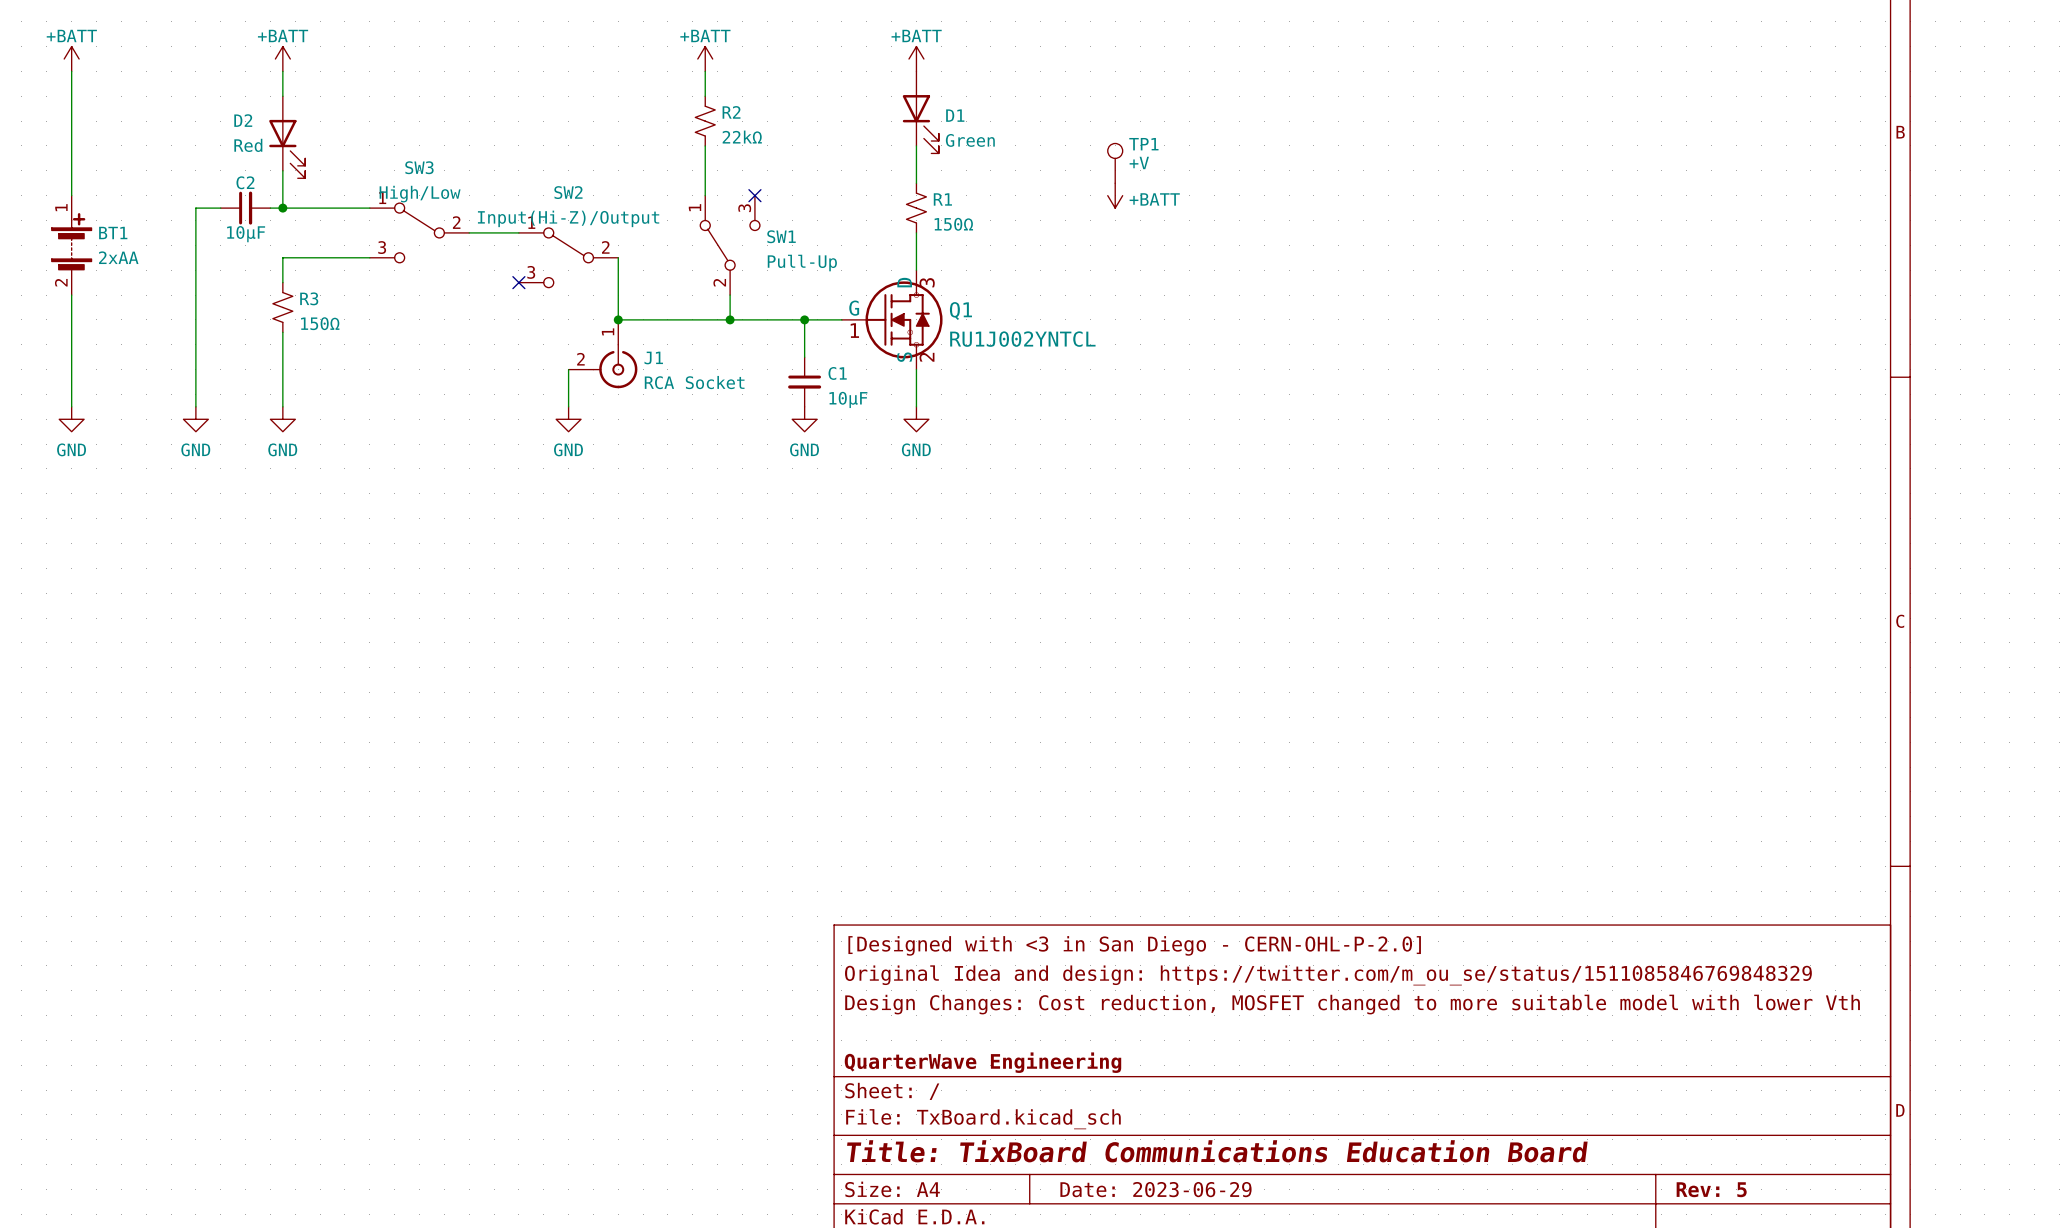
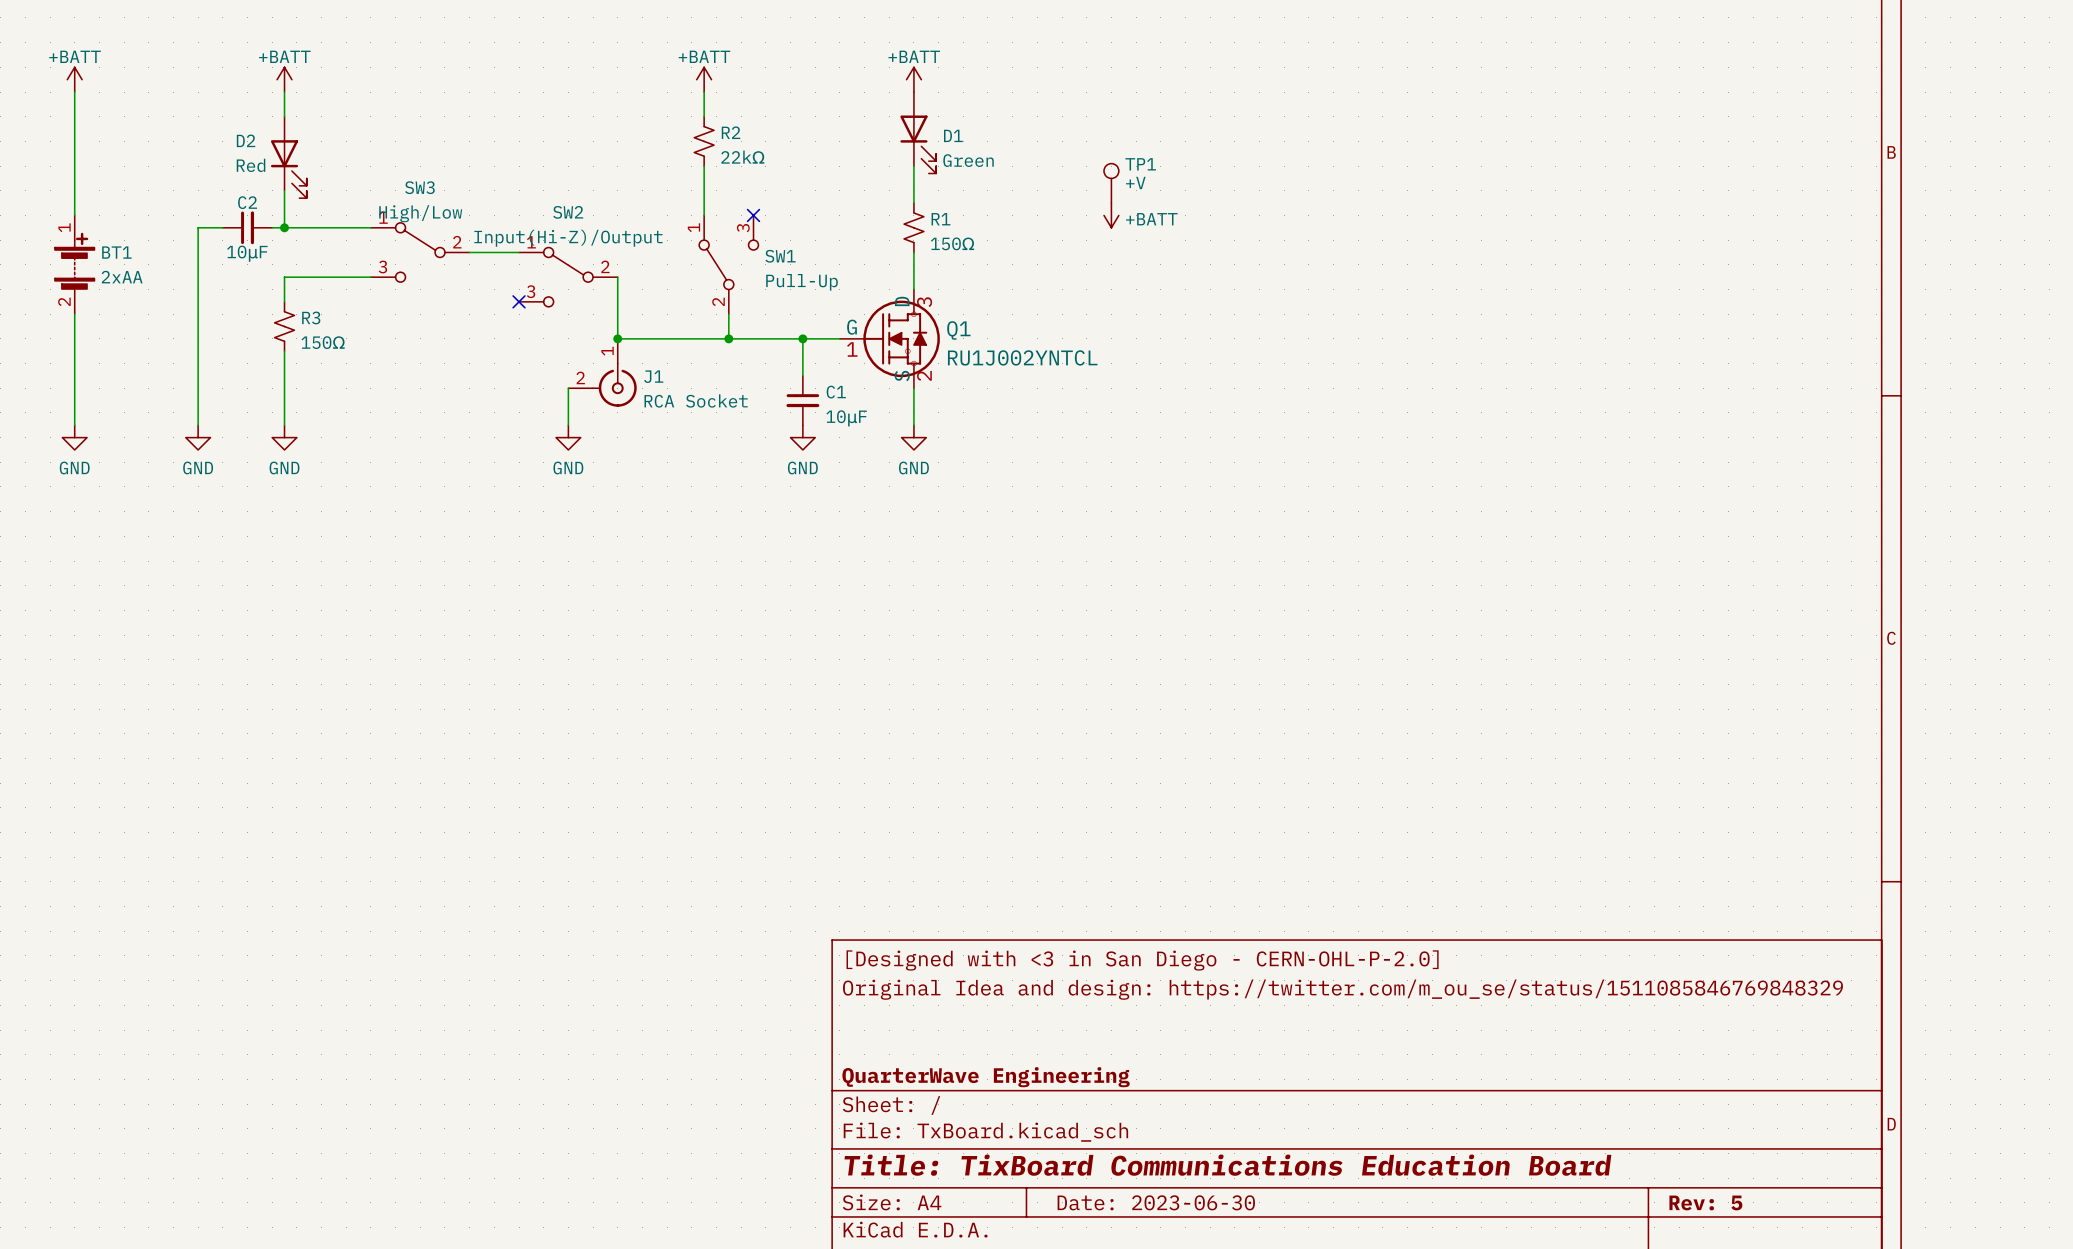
title block: Design Changes: Cost reduction, MOSFET changed to more suitable model with lower Vth (1352, 1004) -> none
title block: Date: 2023-06-29 (1155, 1189) -> Date: 2023-06-30 (1156, 1202)

